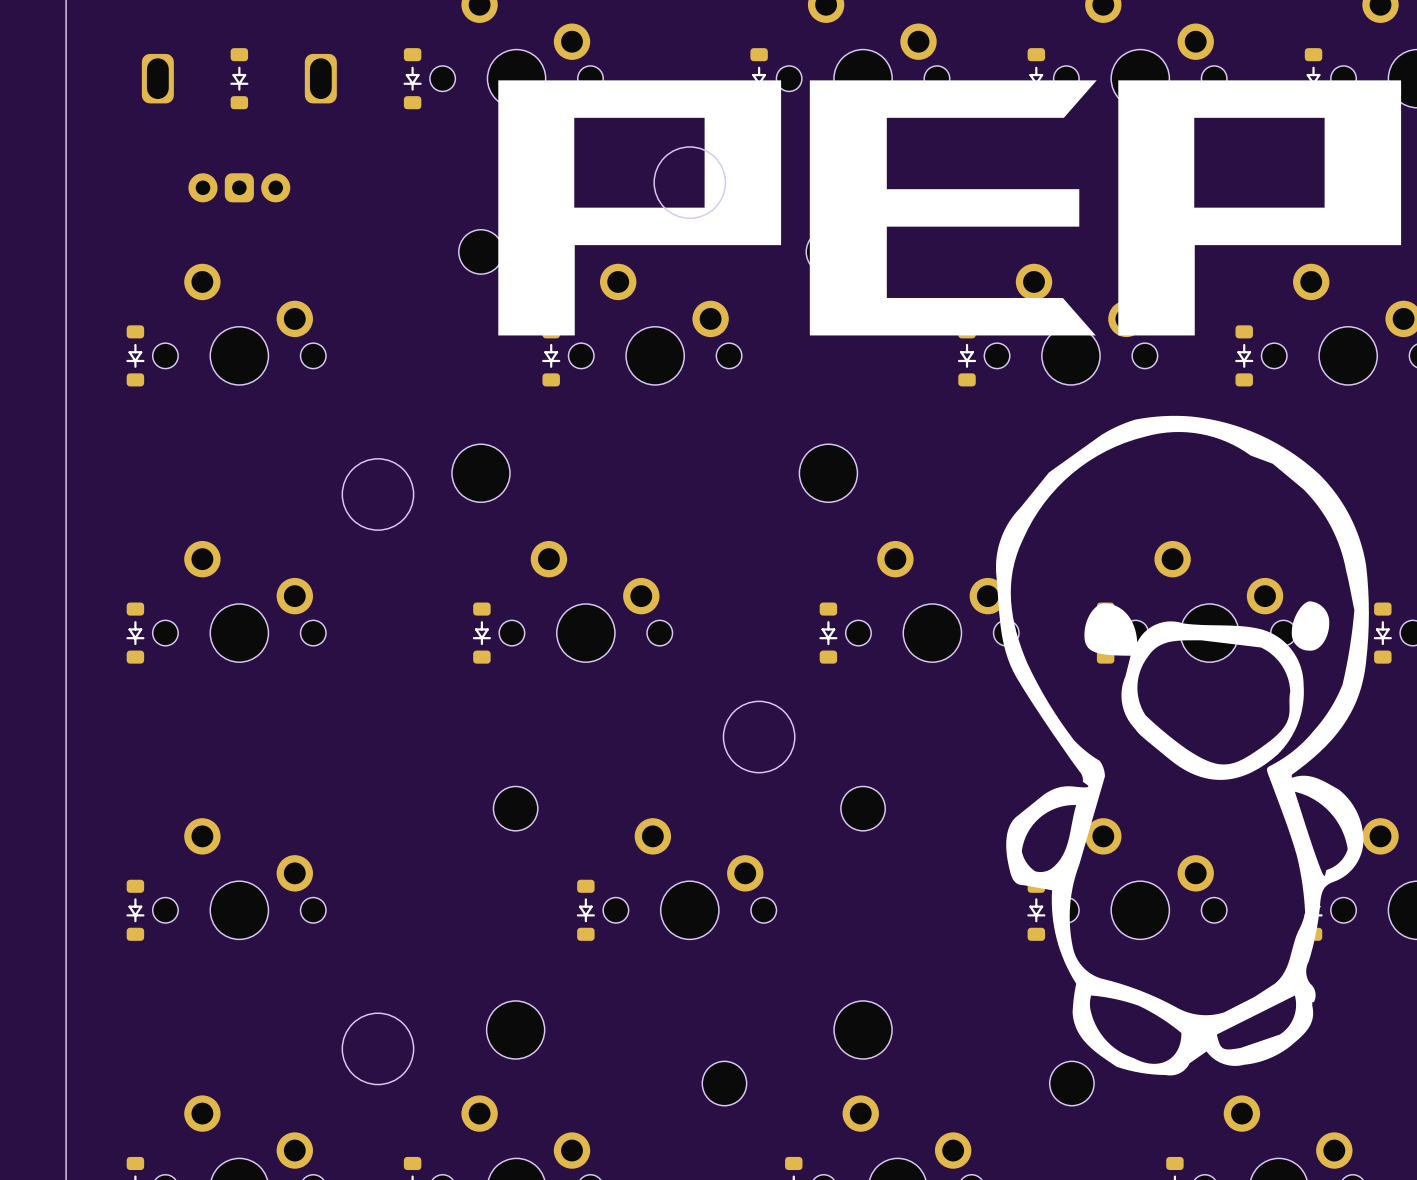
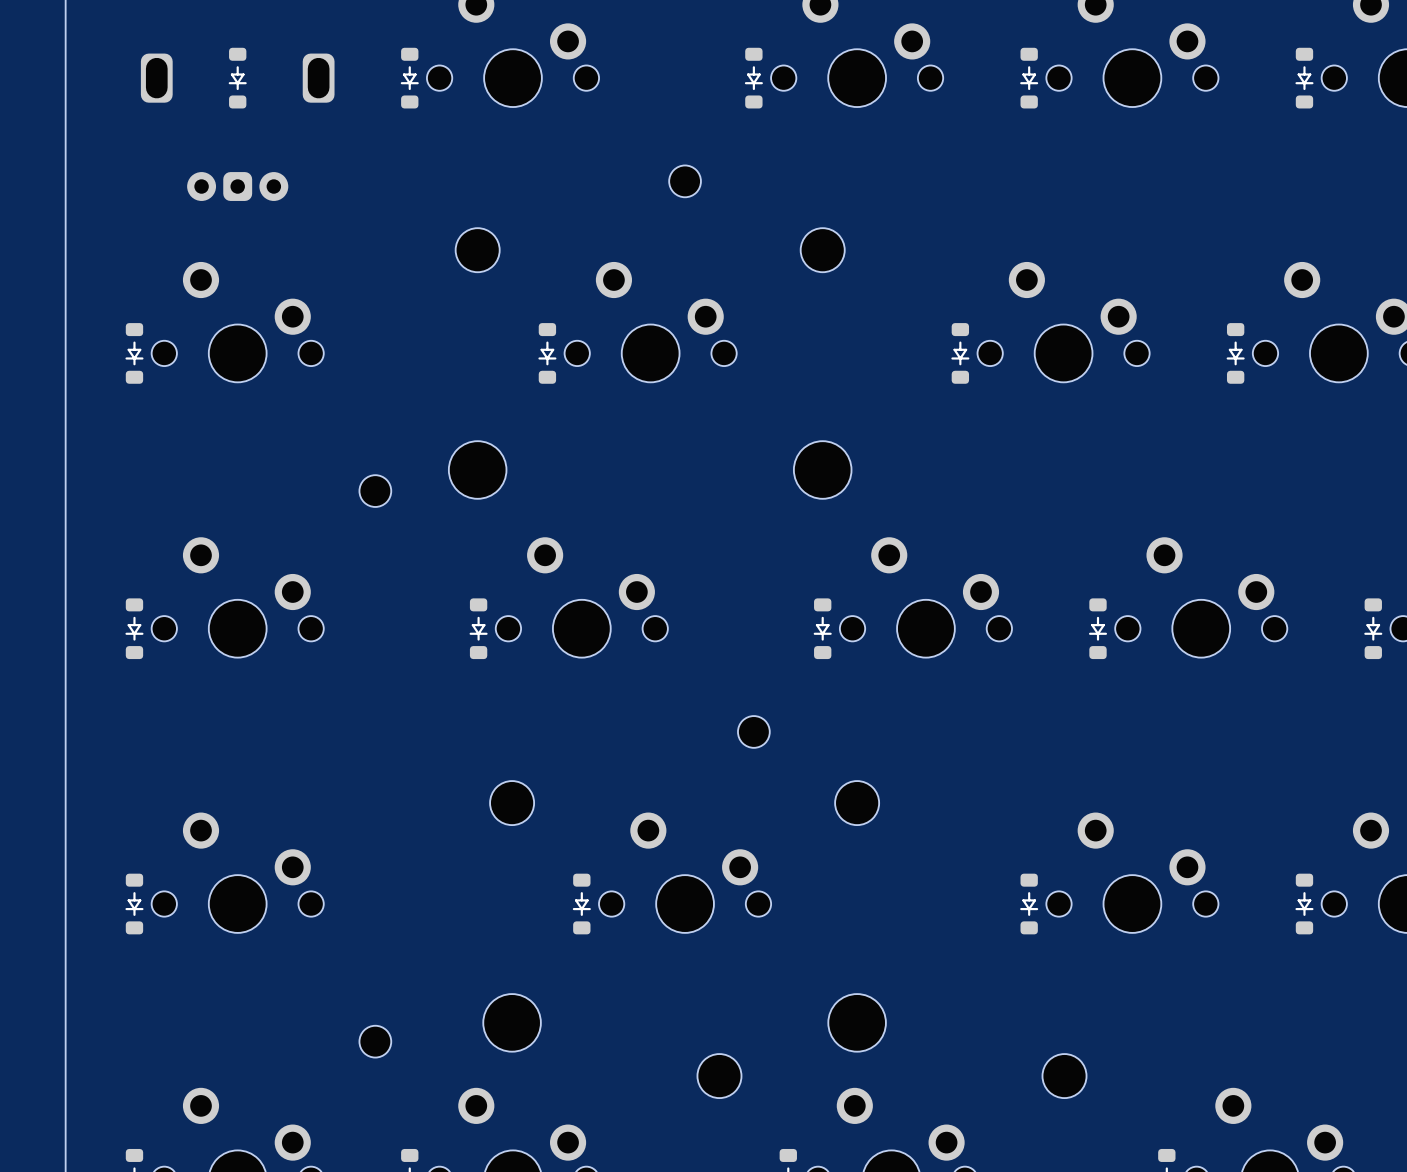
drawing: [498, 80, 782, 336] -> none
drawing: [809, 80, 1097, 336] -> none
drawing: [1118, 80, 1402, 336] -> none
round board edge: [653, 146, 726, 219] -> none
part: none -> (685, 181)
drawing: [995, 415, 1369, 1076] -> none
round board edge: [341, 458, 414, 531] -> none
part: none -> (375, 491)
round board edge: [723, 701, 796, 774] -> none
part: none -> (753, 731)
round board edge: [341, 1012, 414, 1085] -> none
part: none -> (375, 1041)

